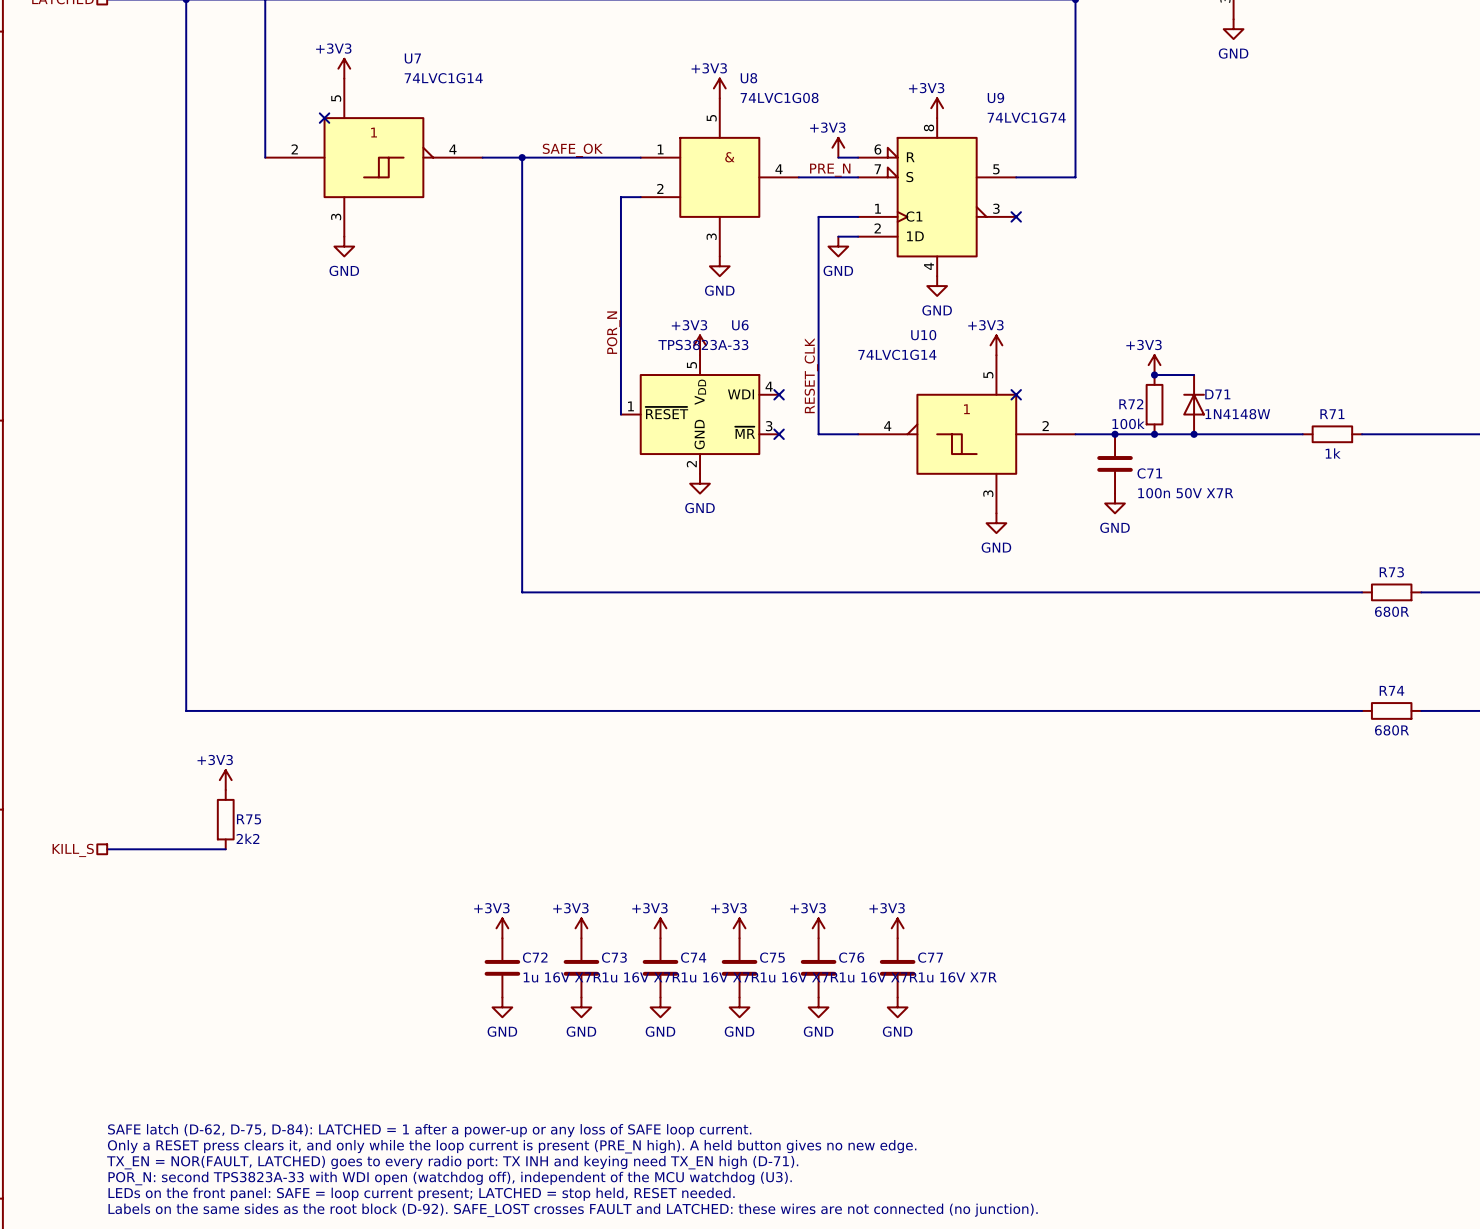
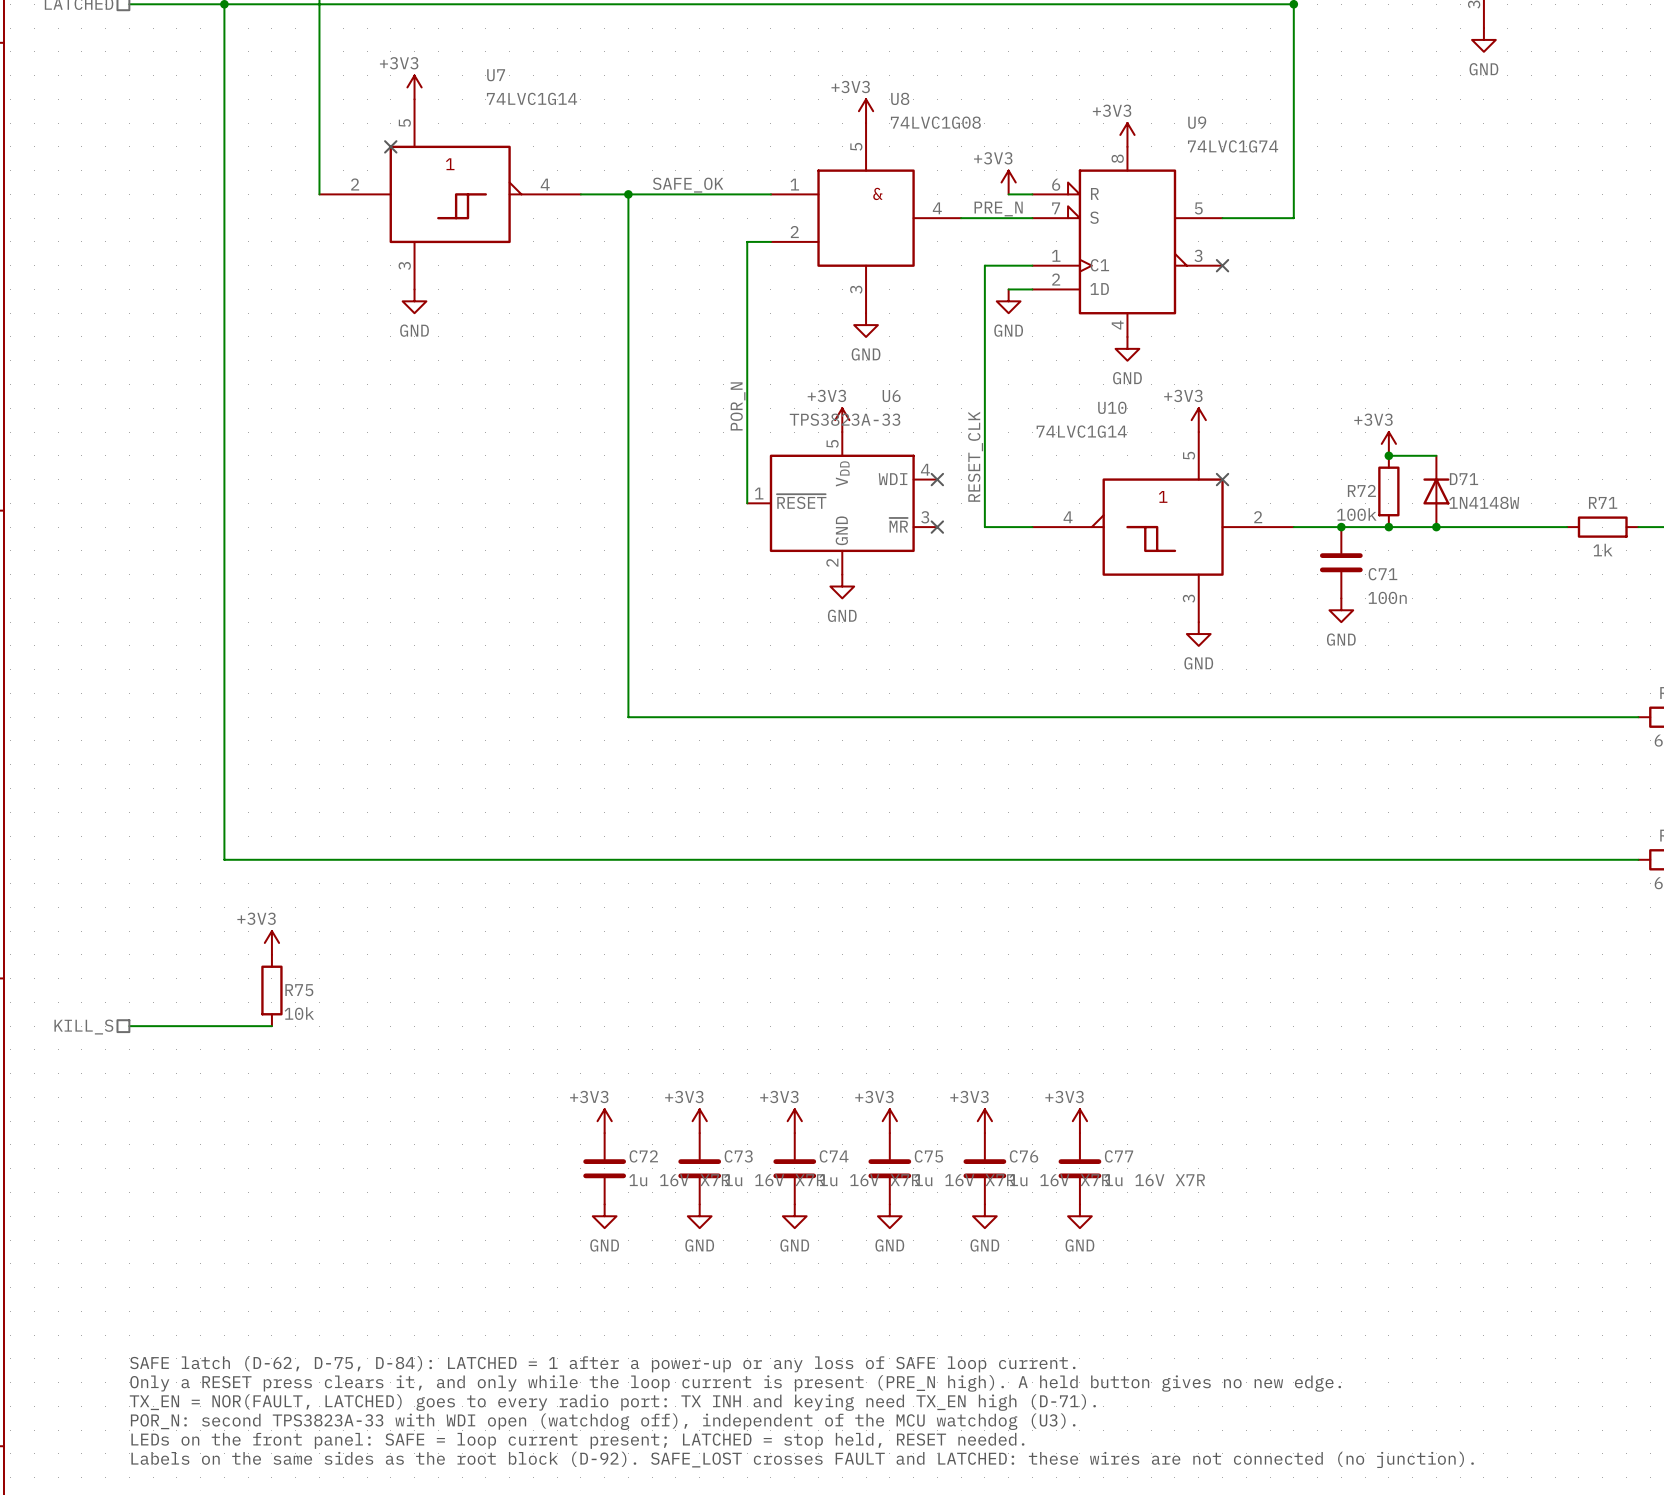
C71 value: 100n 50V X7R (1185, 493) -> 100n (1387, 597)
R75 value: 2k2 (247, 838) -> 10k (299, 1013)

